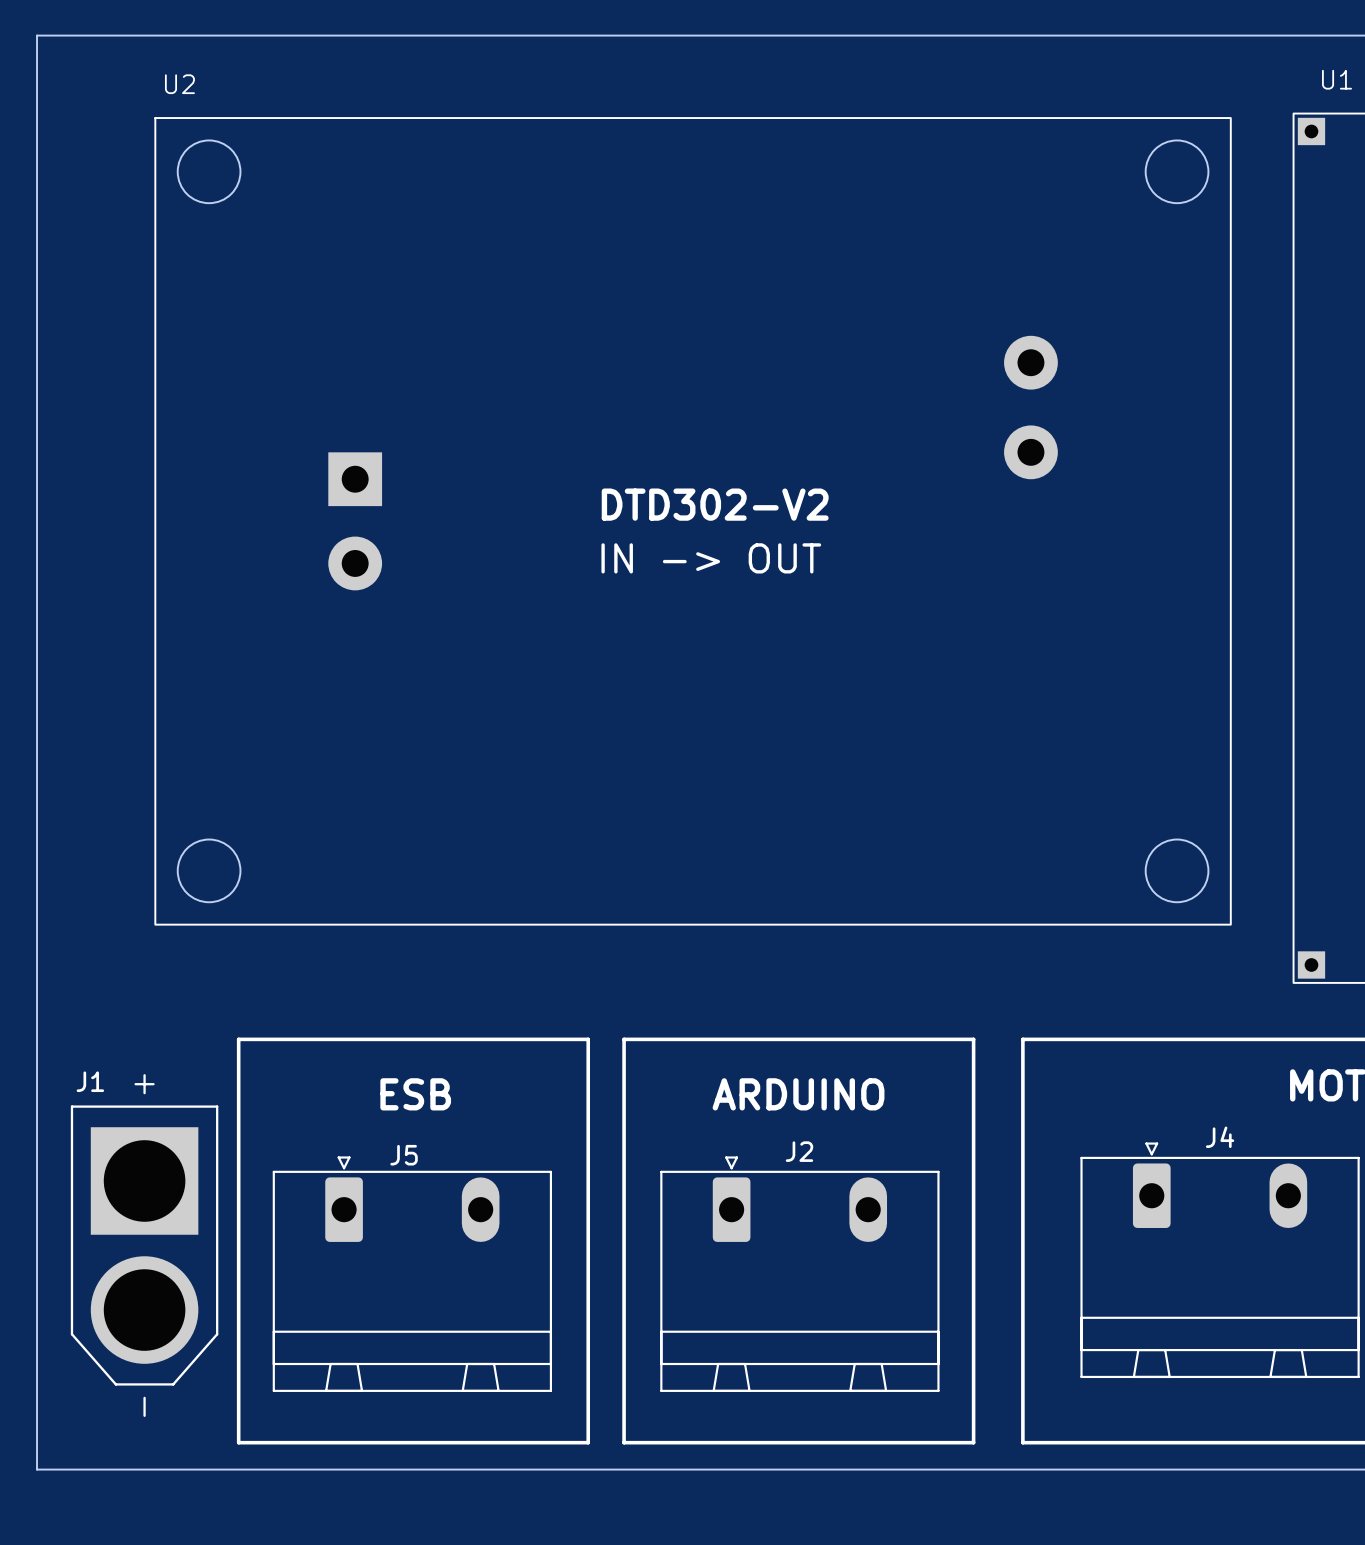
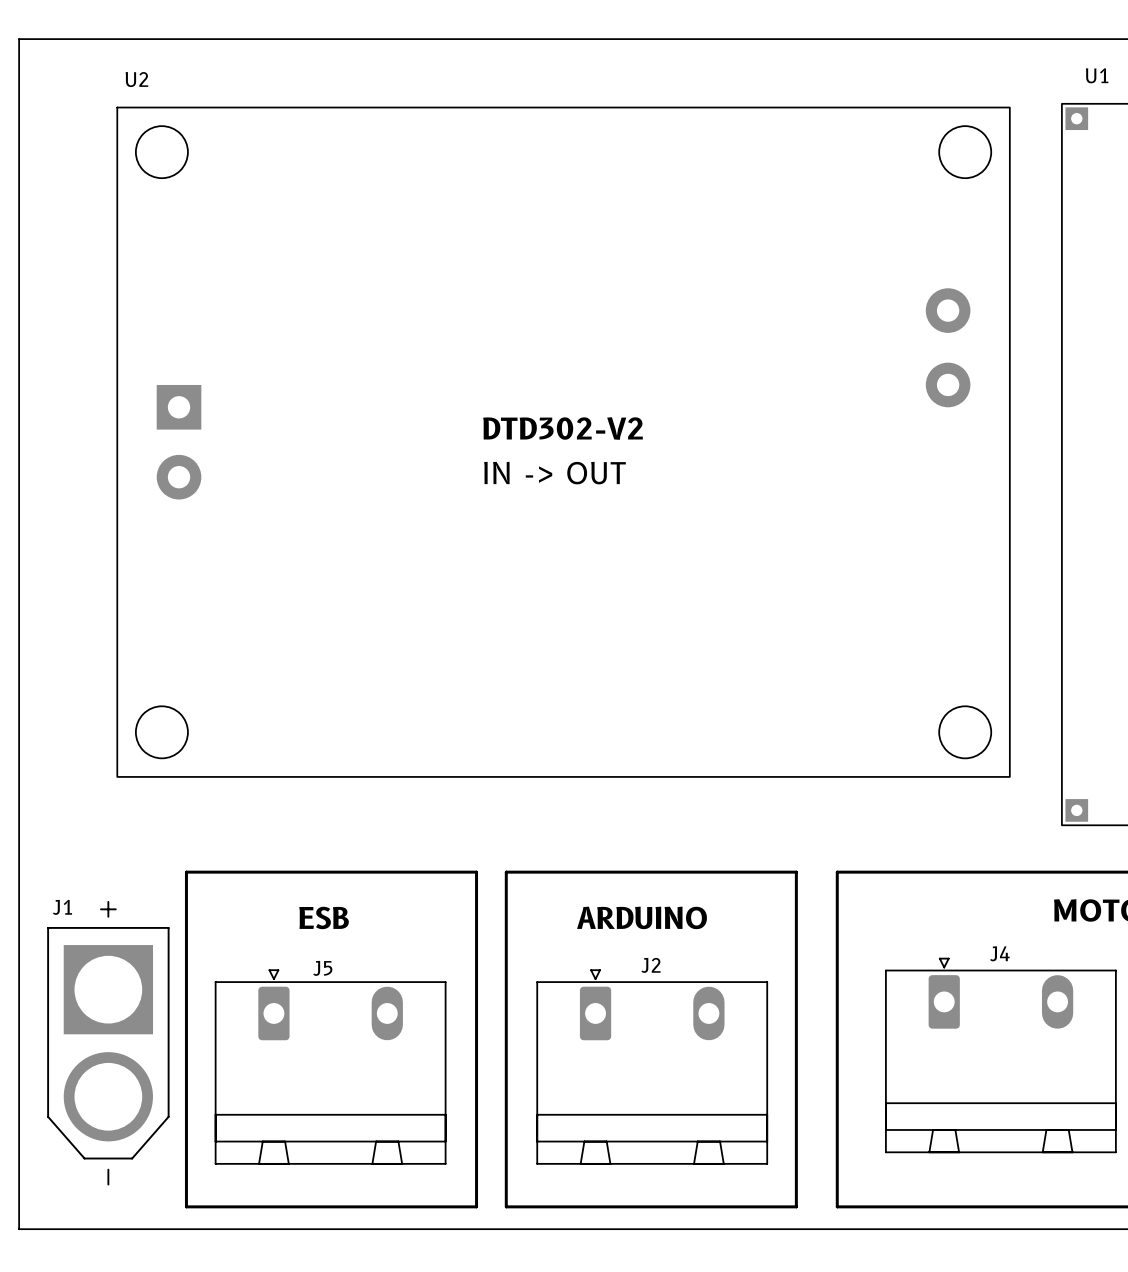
U2 footprint: [154, 117, 1232, 926] -> [116, 106, 1011, 778]

